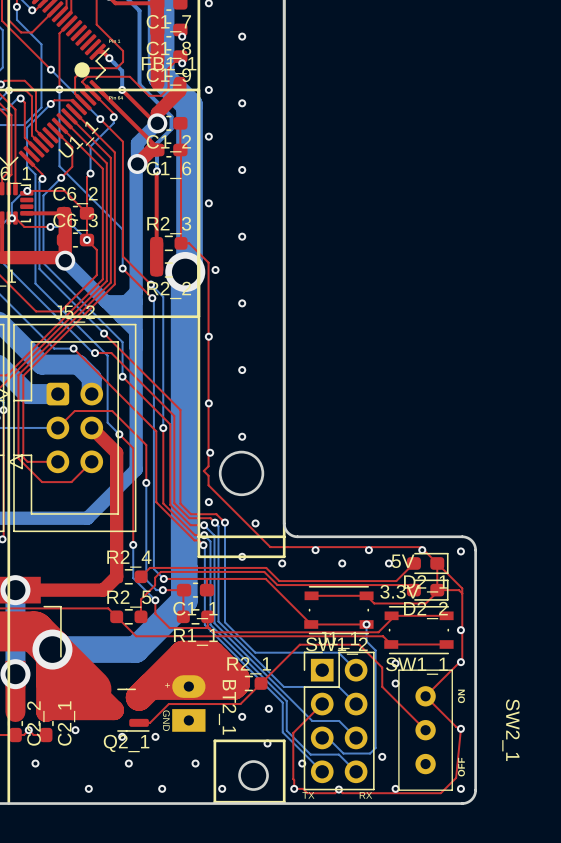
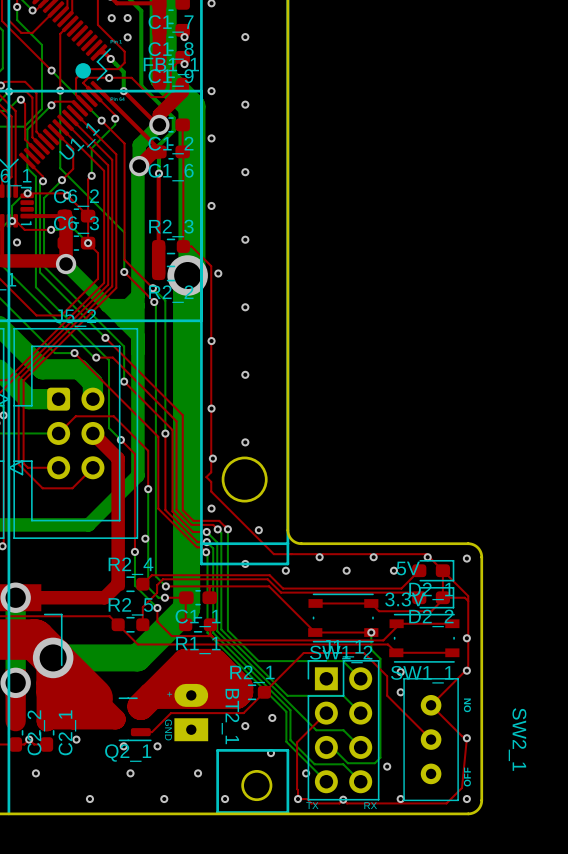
via: none -> (111, 18)
via: none -> (127, 18)
via: none -> (127, 37)
via: none -> (109, 78)
via: none -> (67, 195)
via: none -> (17, 242)
via: none -> (145, 538)

